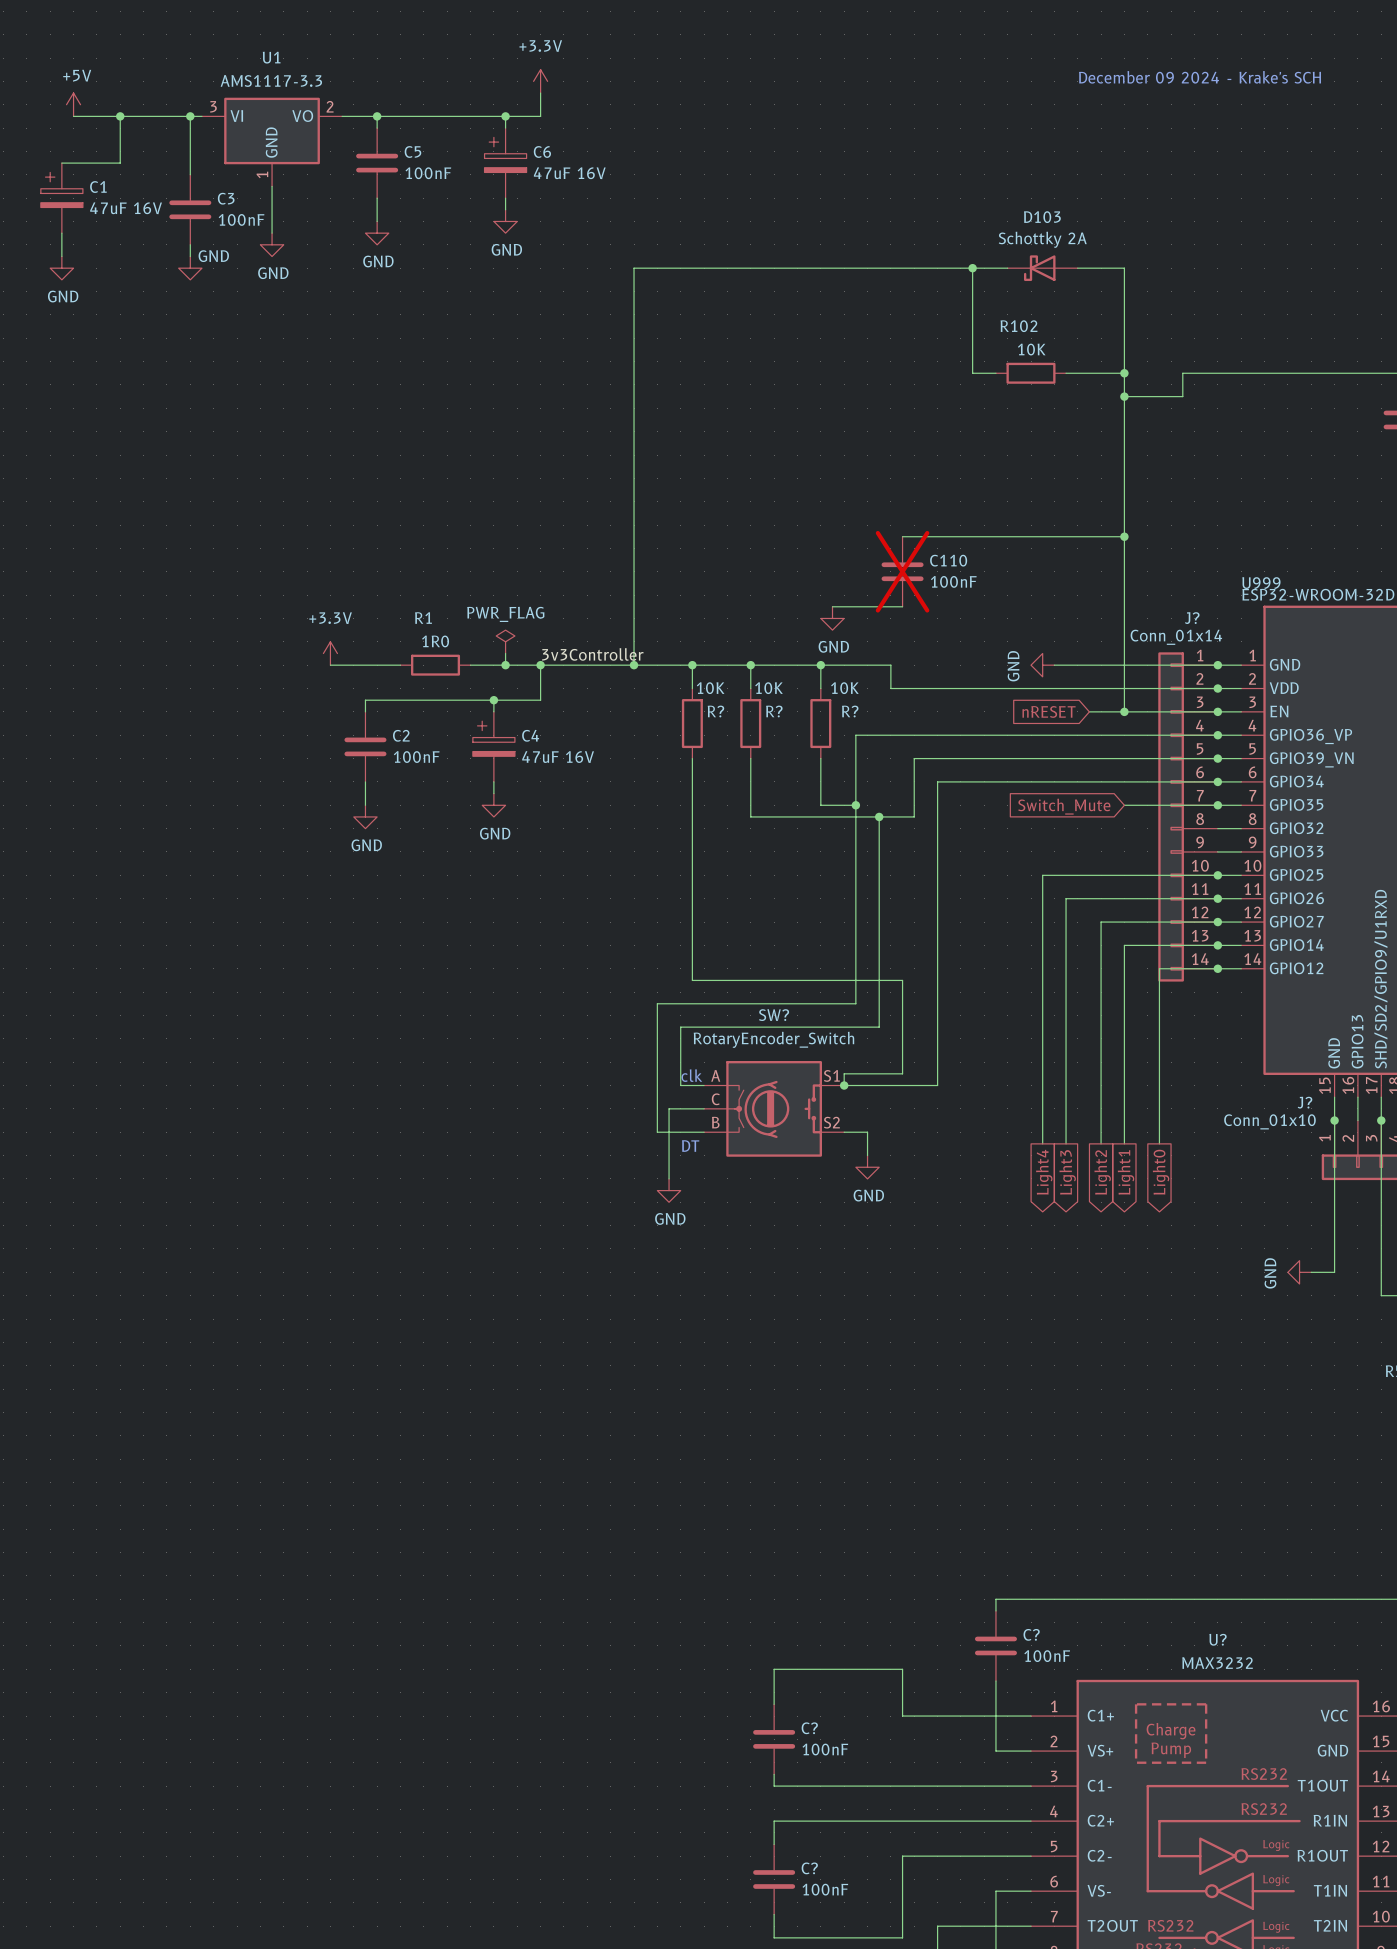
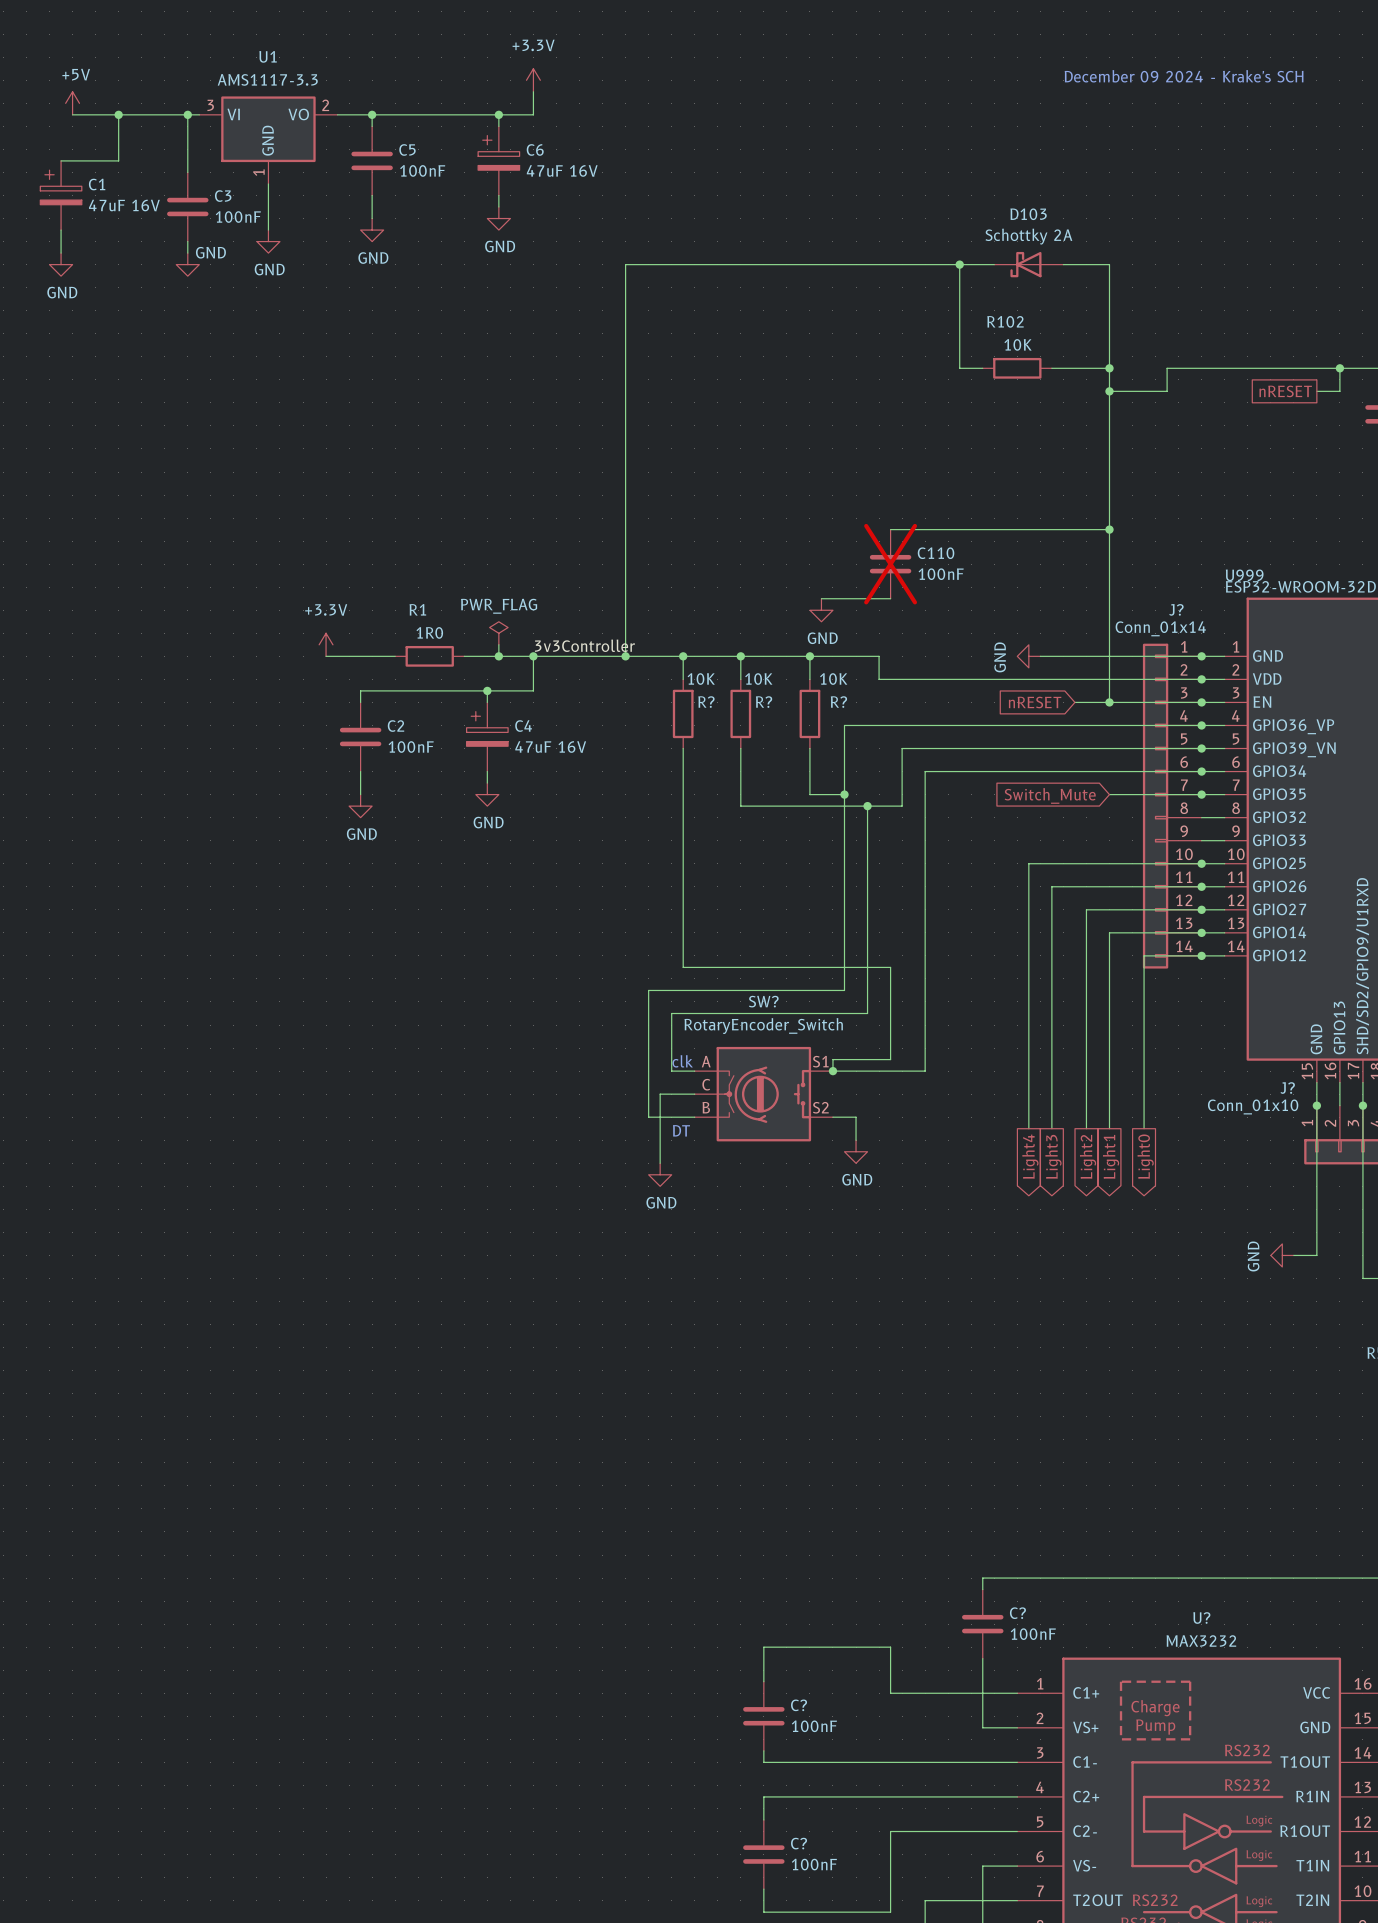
wire: none -> (1339, 368) (1339, 391) (1316, 391)
junction: none -> (1339, 368)
global label: none -> nRESET (1285, 391)

